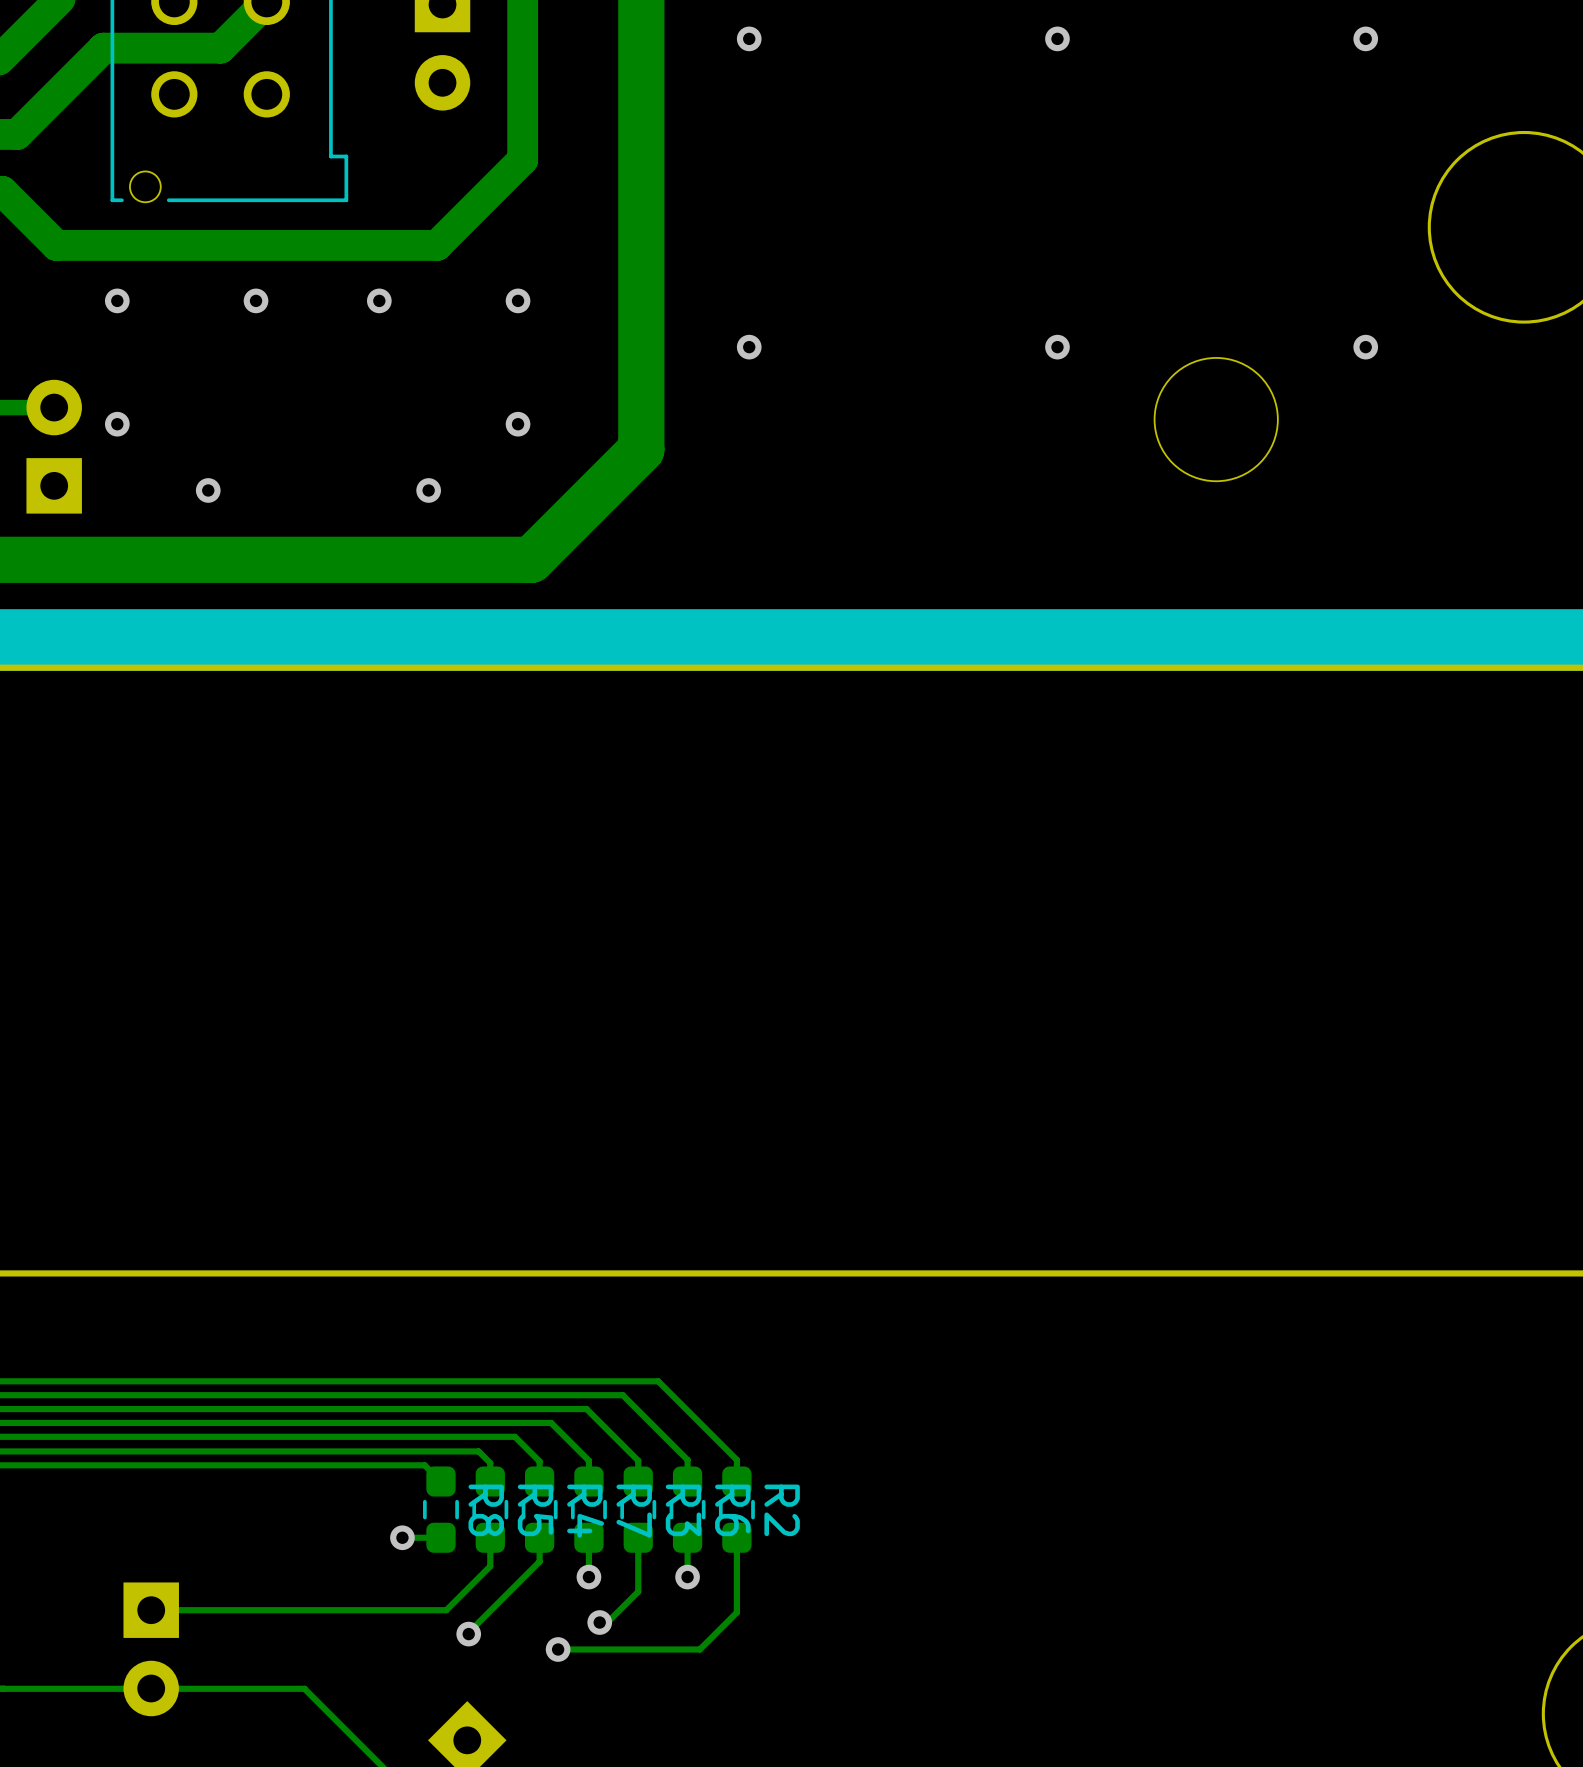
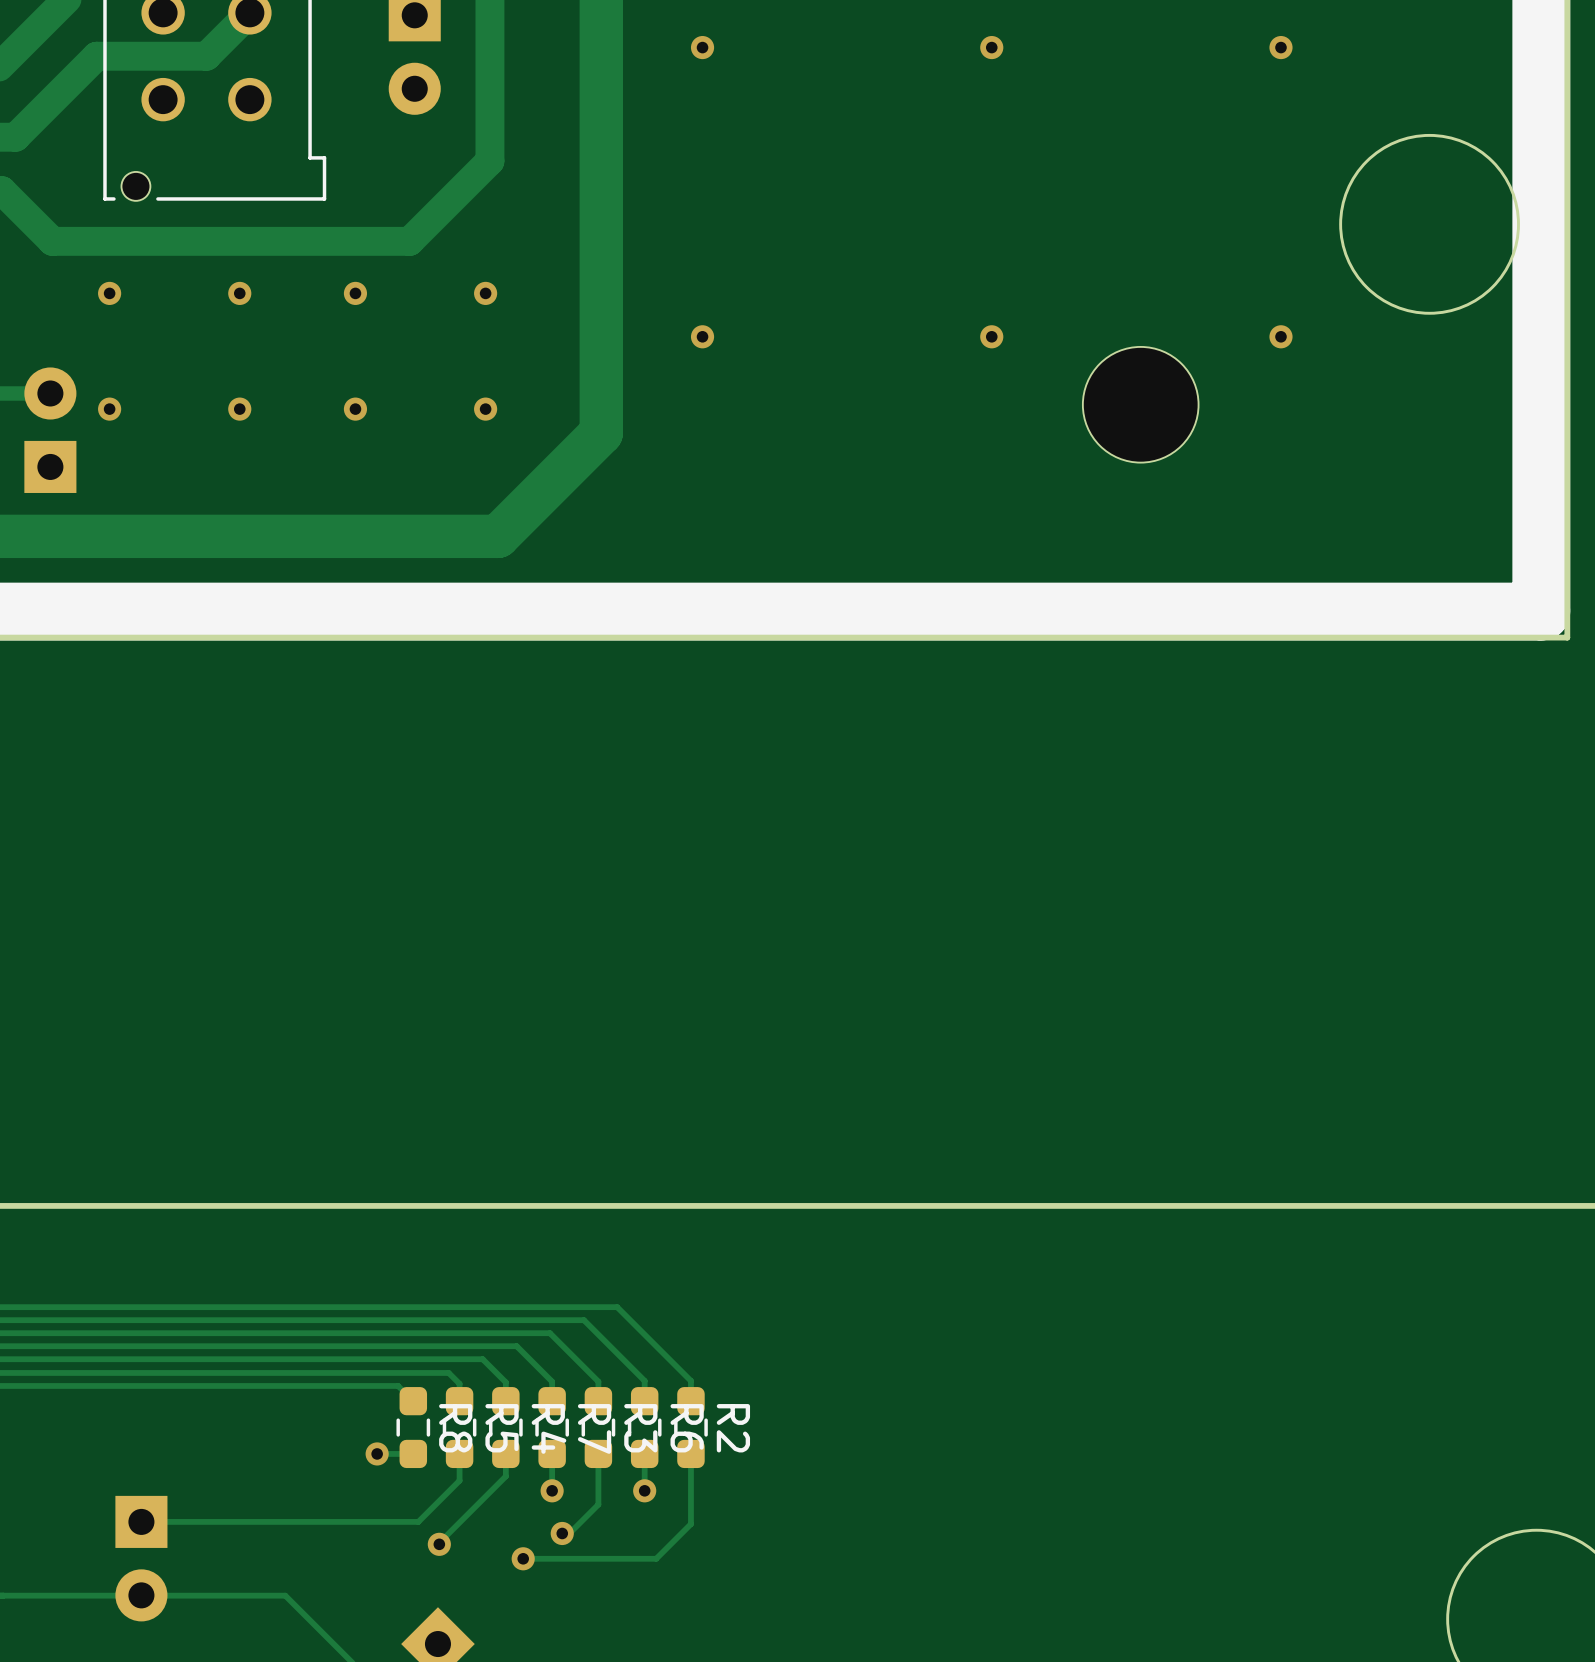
via position: (208, 490) -> (239, 409)
via position: (428, 490) -> (355, 409)

